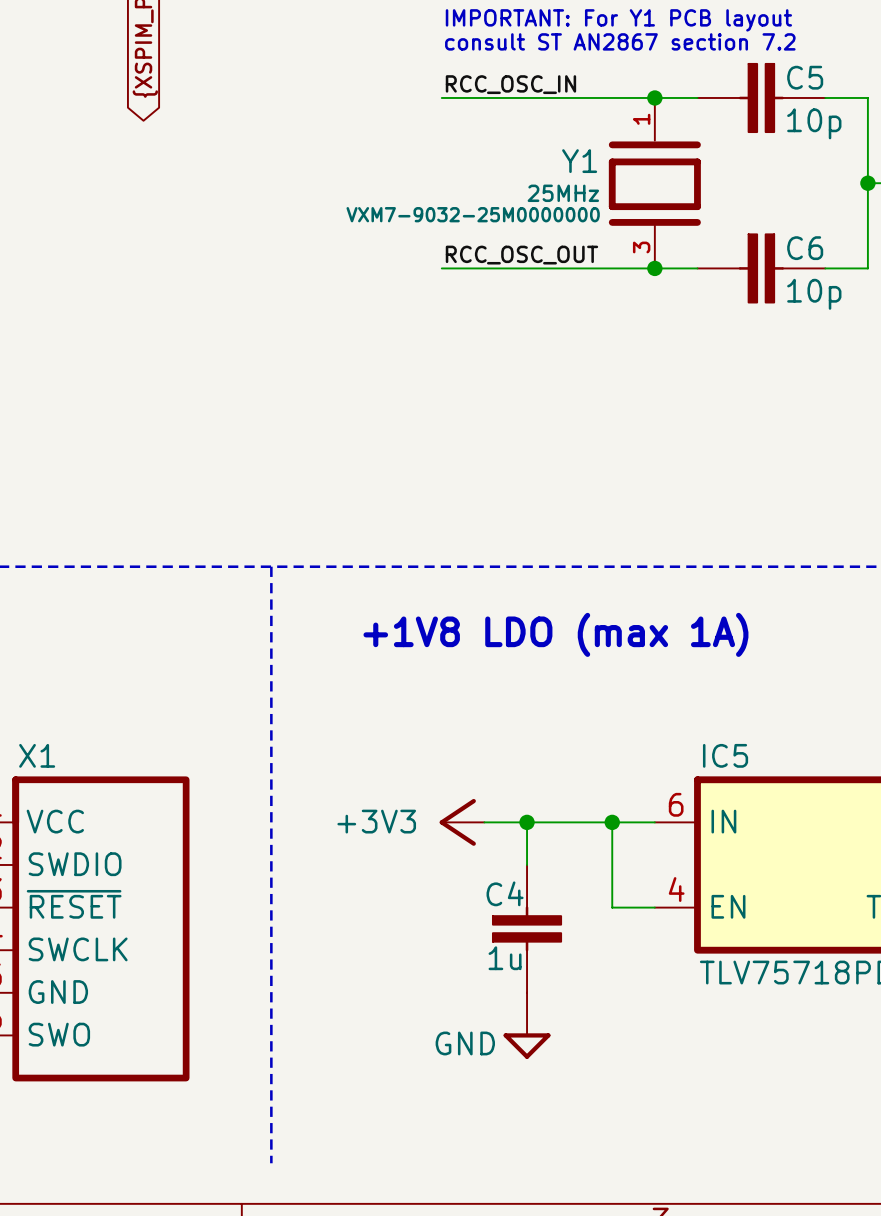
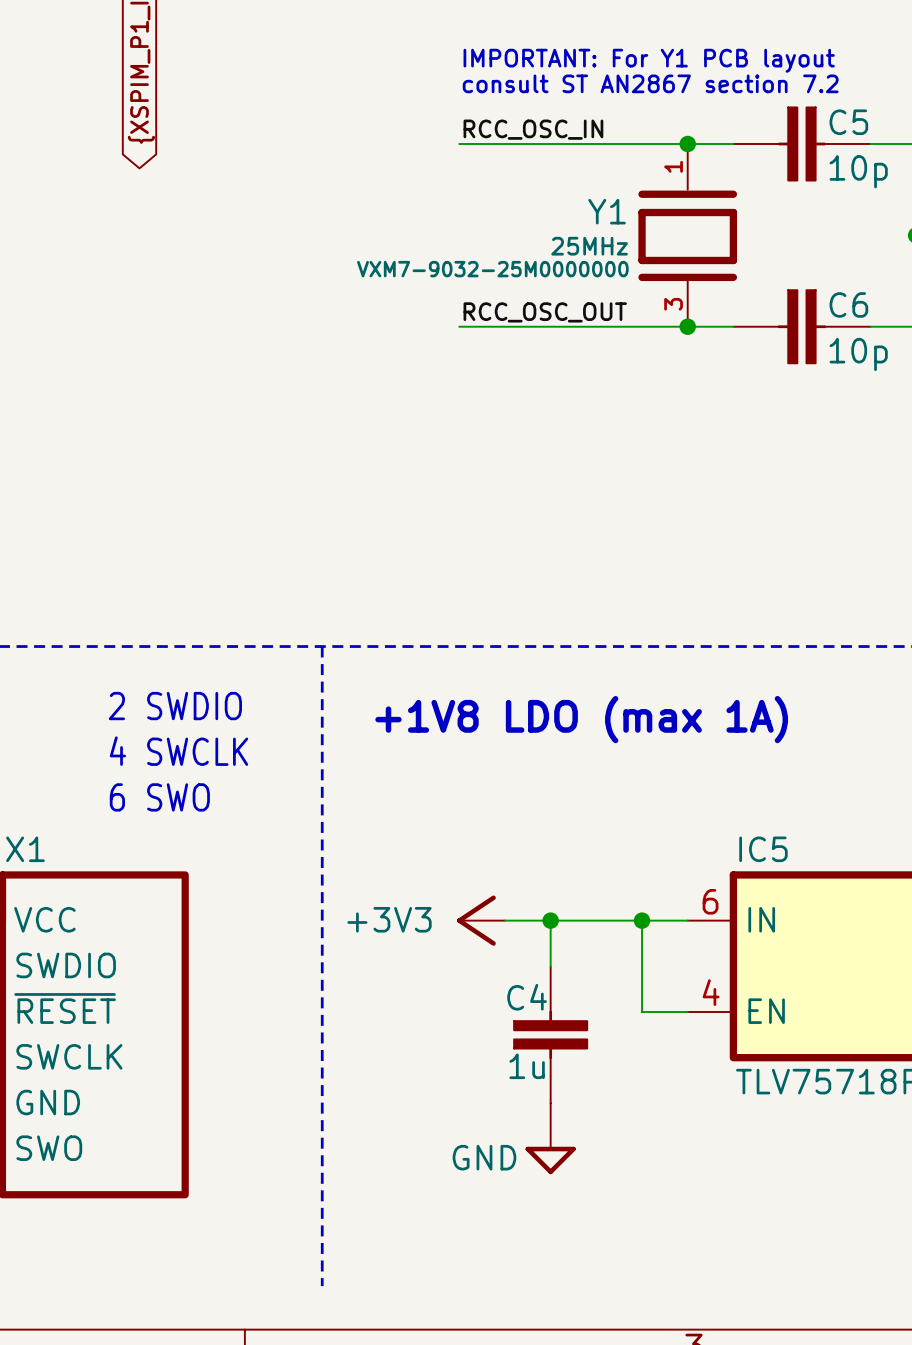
line: (271, 566) (271, 1163) -> (322, 646) (322, 1286)
text: none -> 2 SWDIO (175, 706)
text: none -> 4 SWCLK (179, 751)
text: none -> 6 SWO (159, 797)

